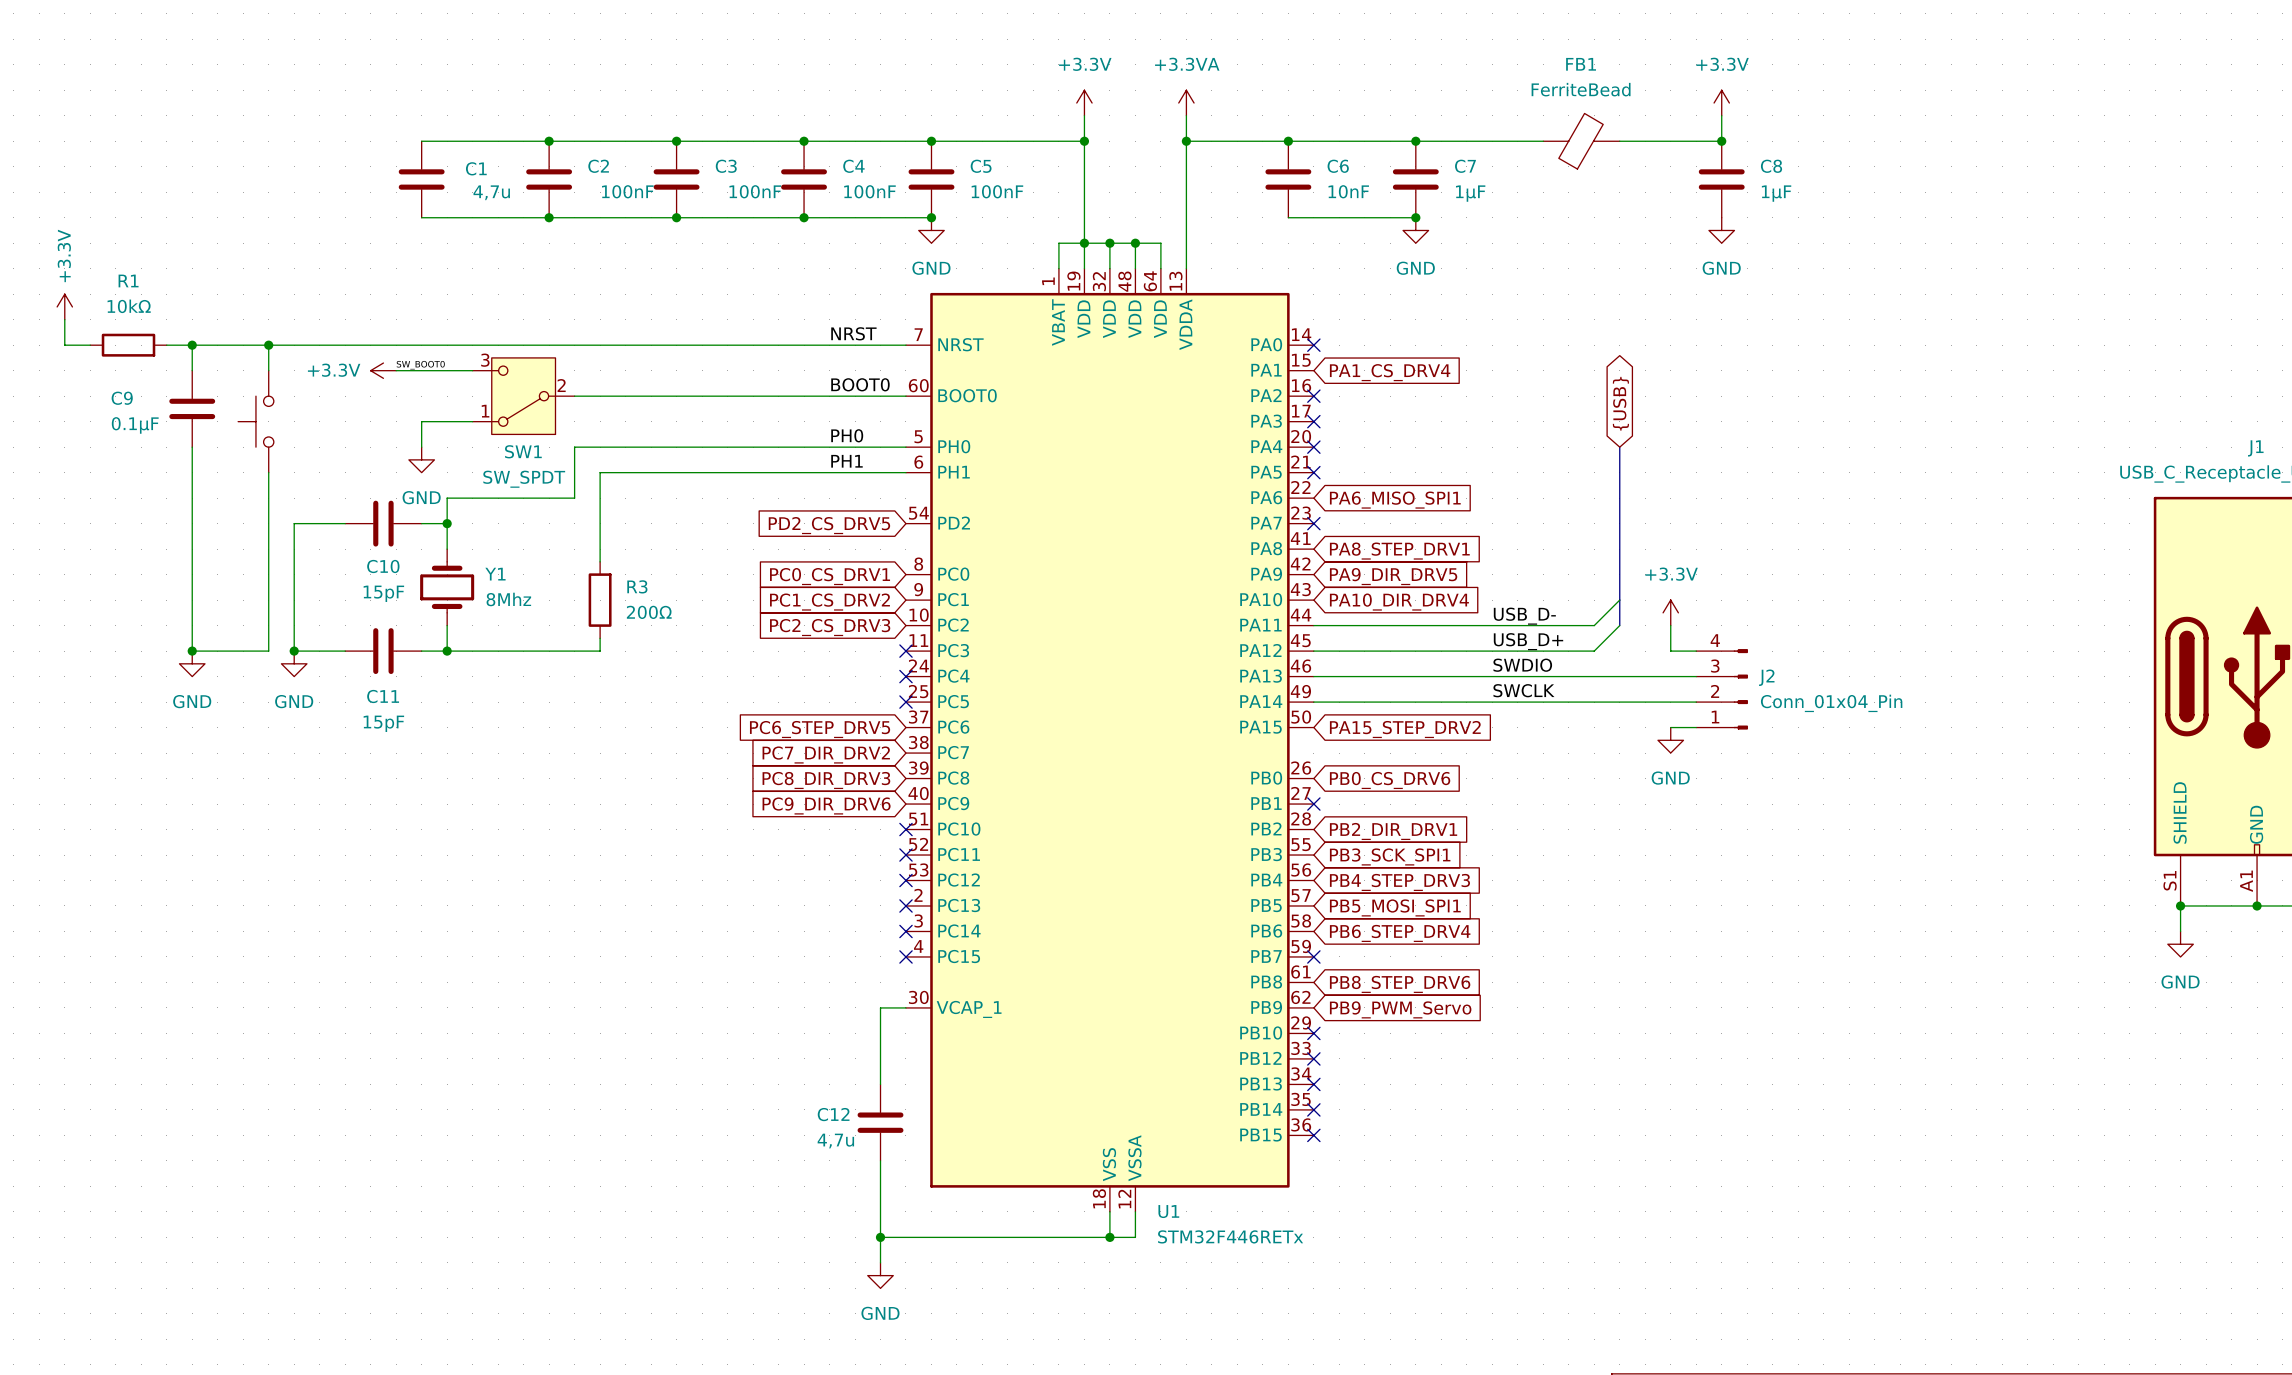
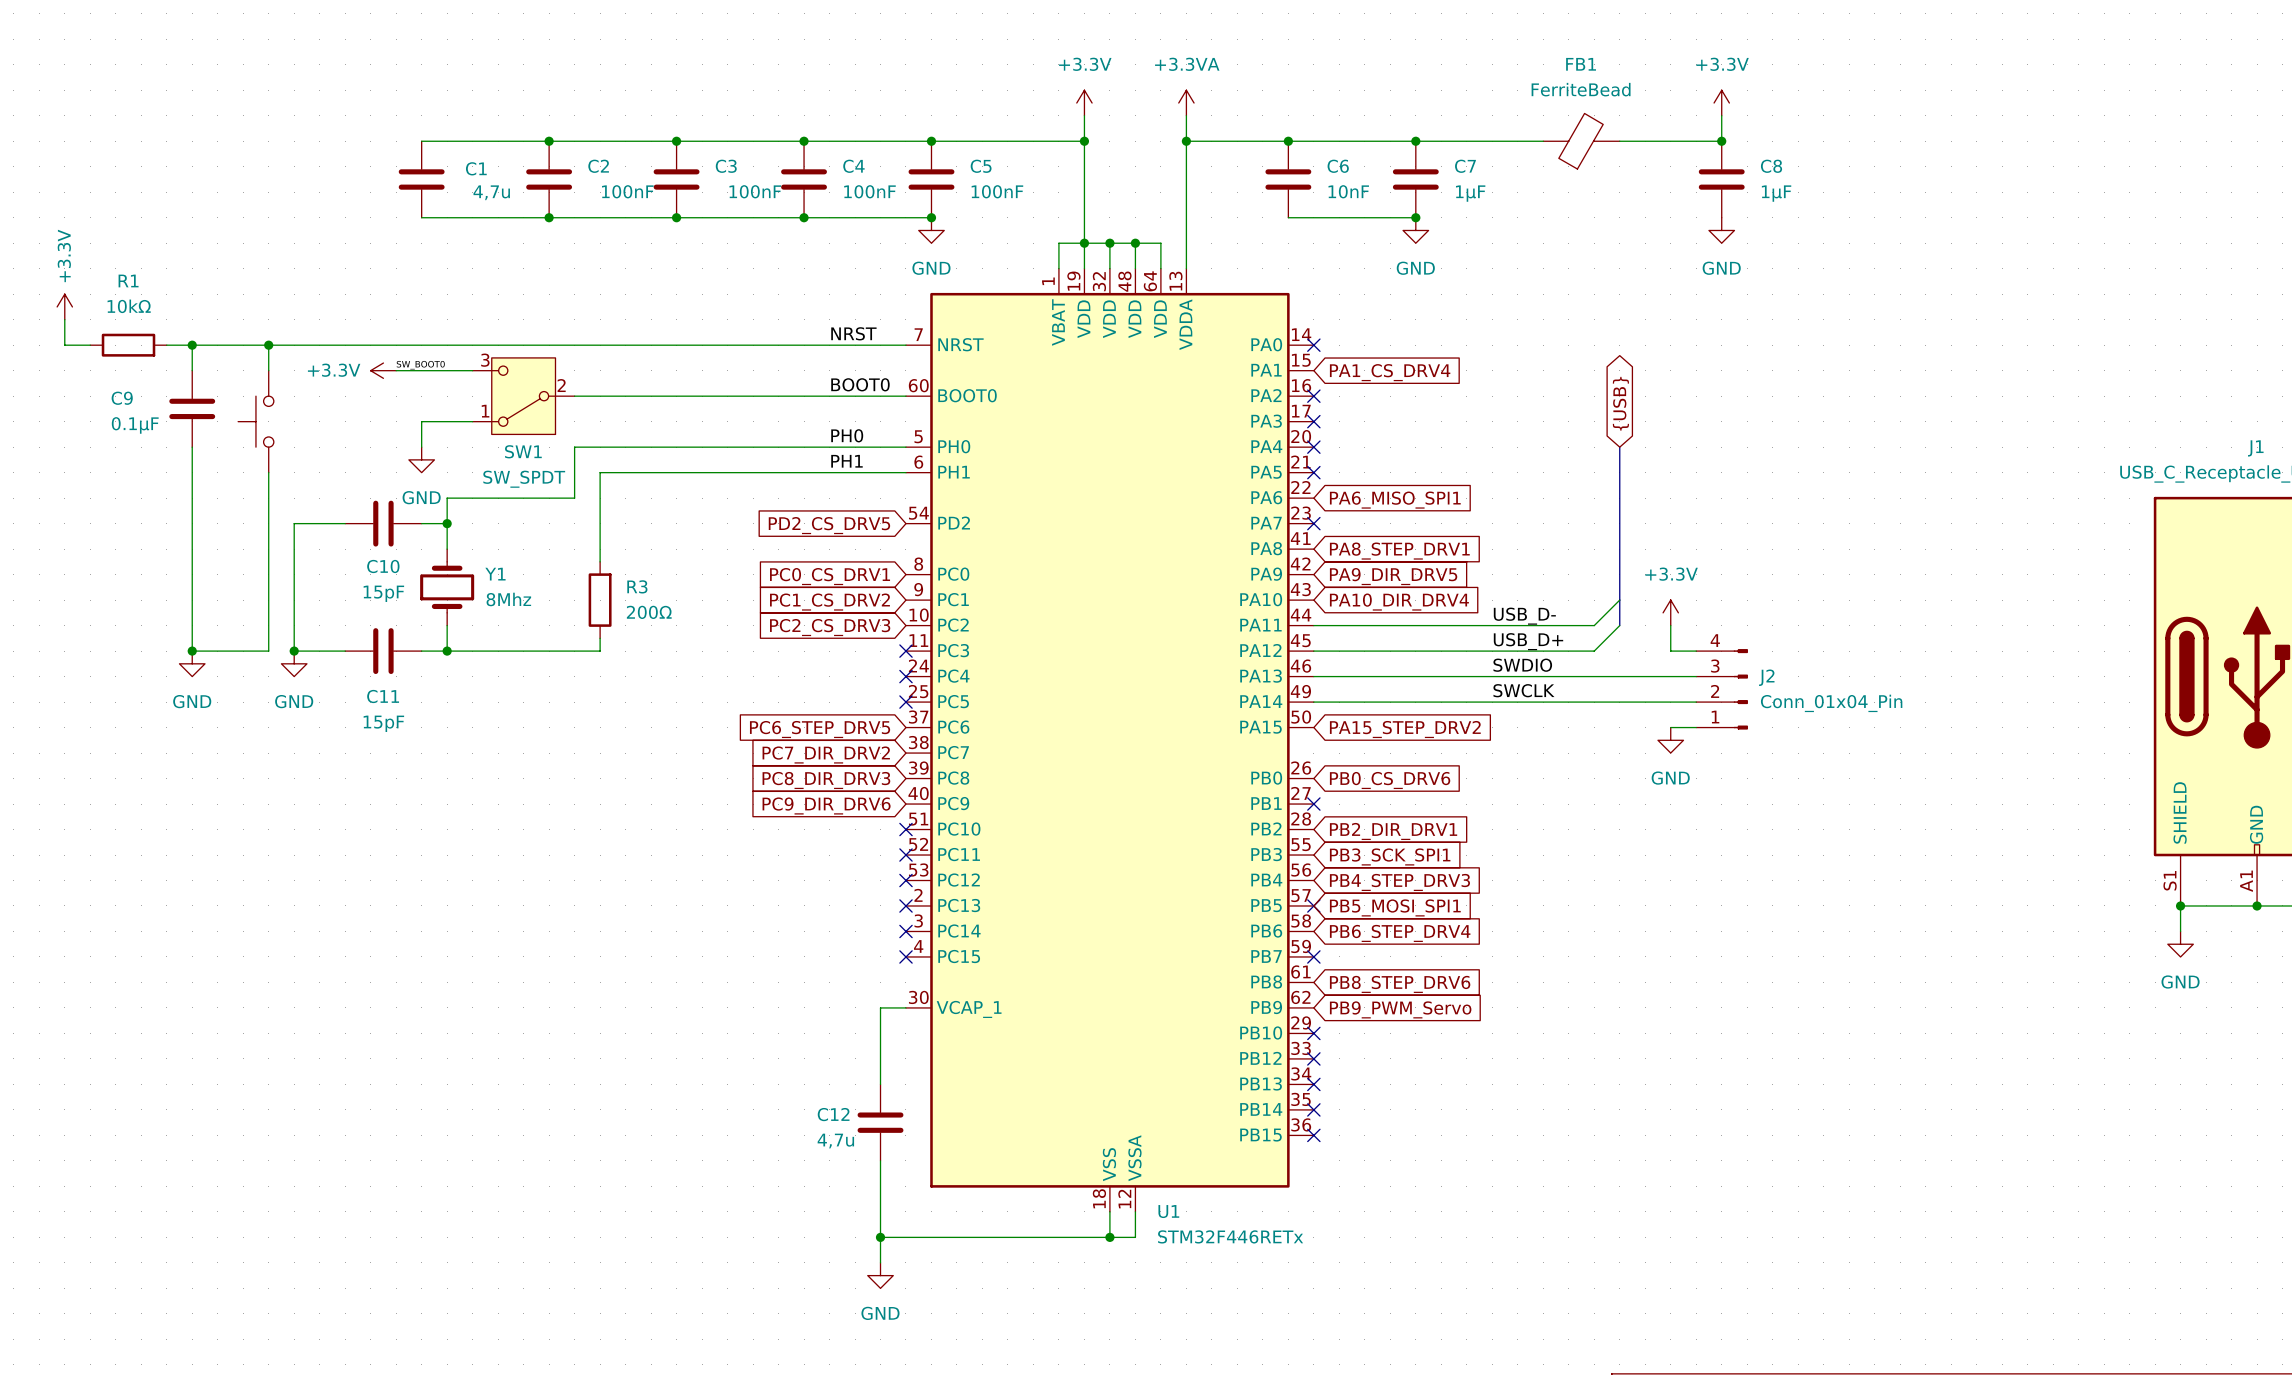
no-connect mark: none -> (1313, 905)

